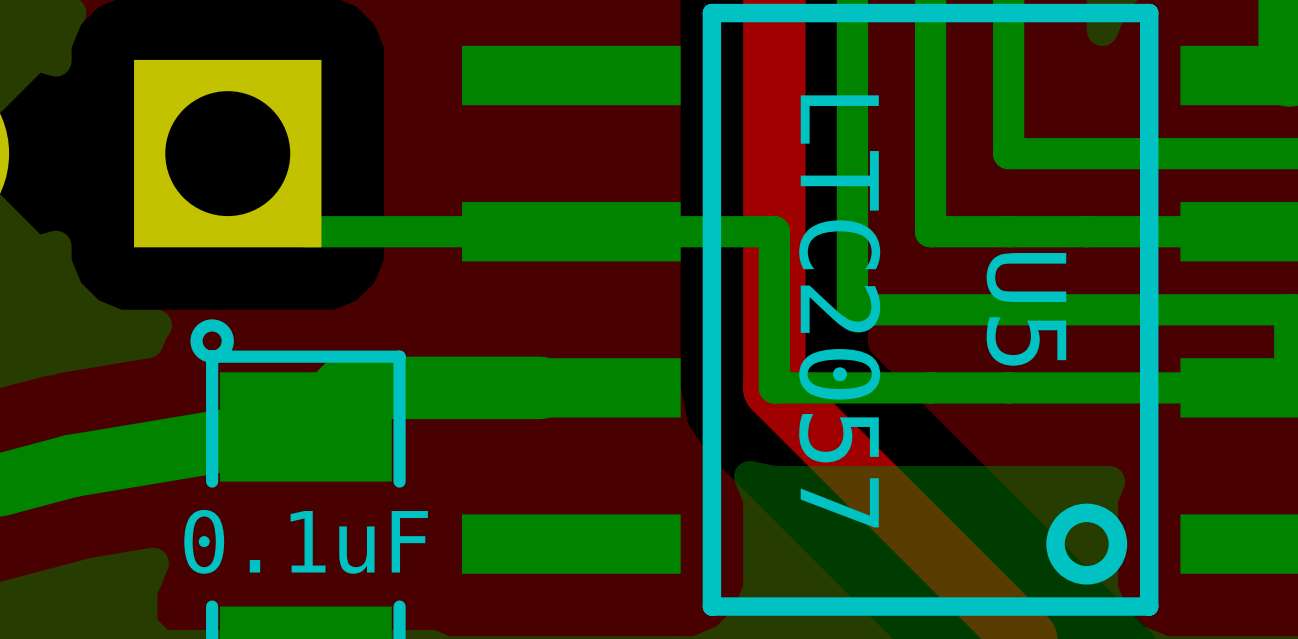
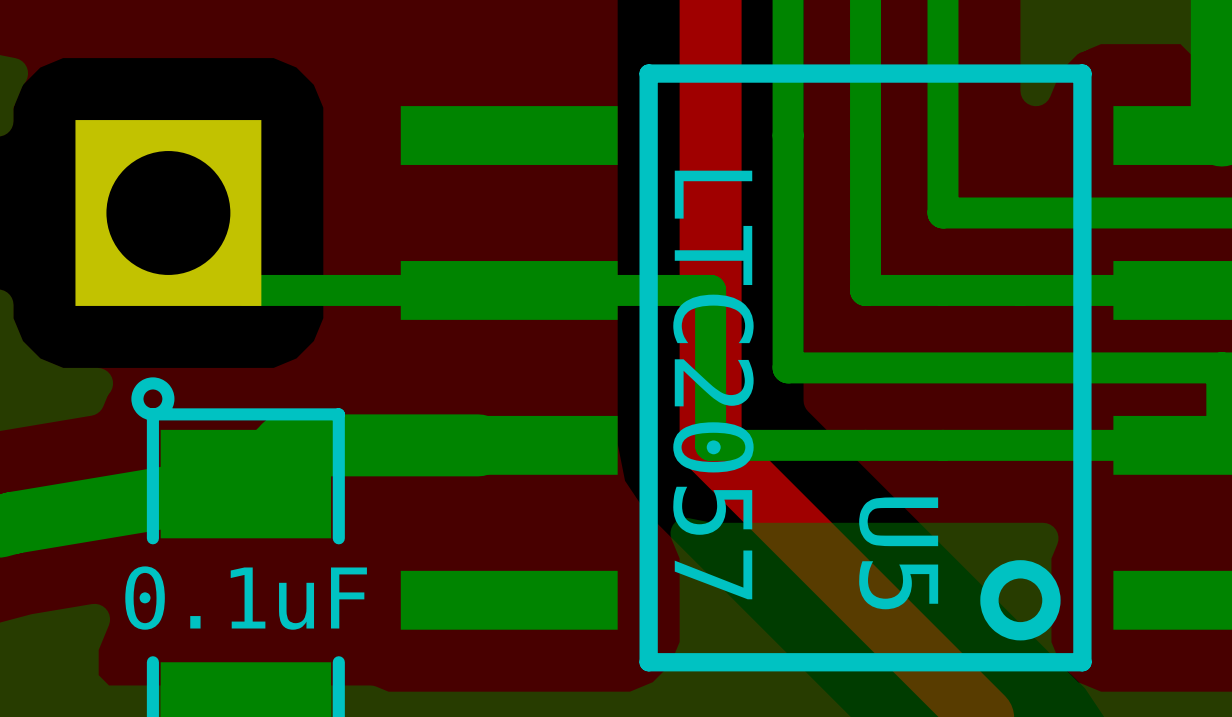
U5 name position: U5 (1026, 309) -> U5 (898, 553)
U5 value position: LTC2057 (839, 311) -> LTC2057 (713, 384)

